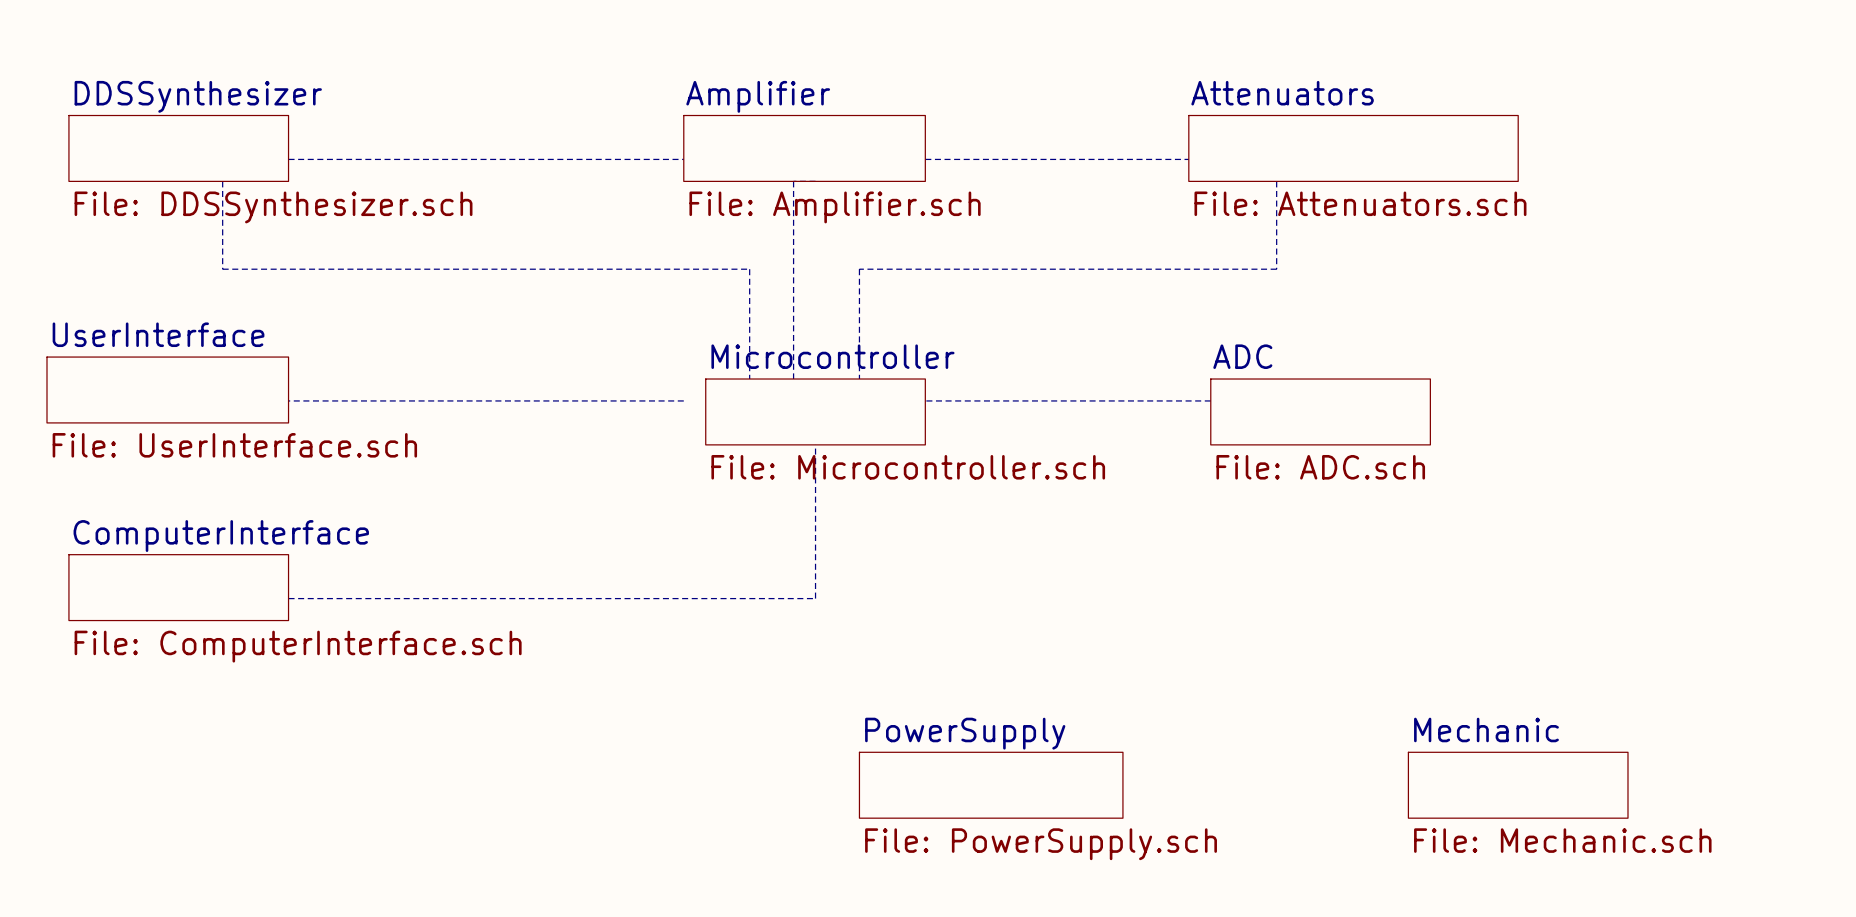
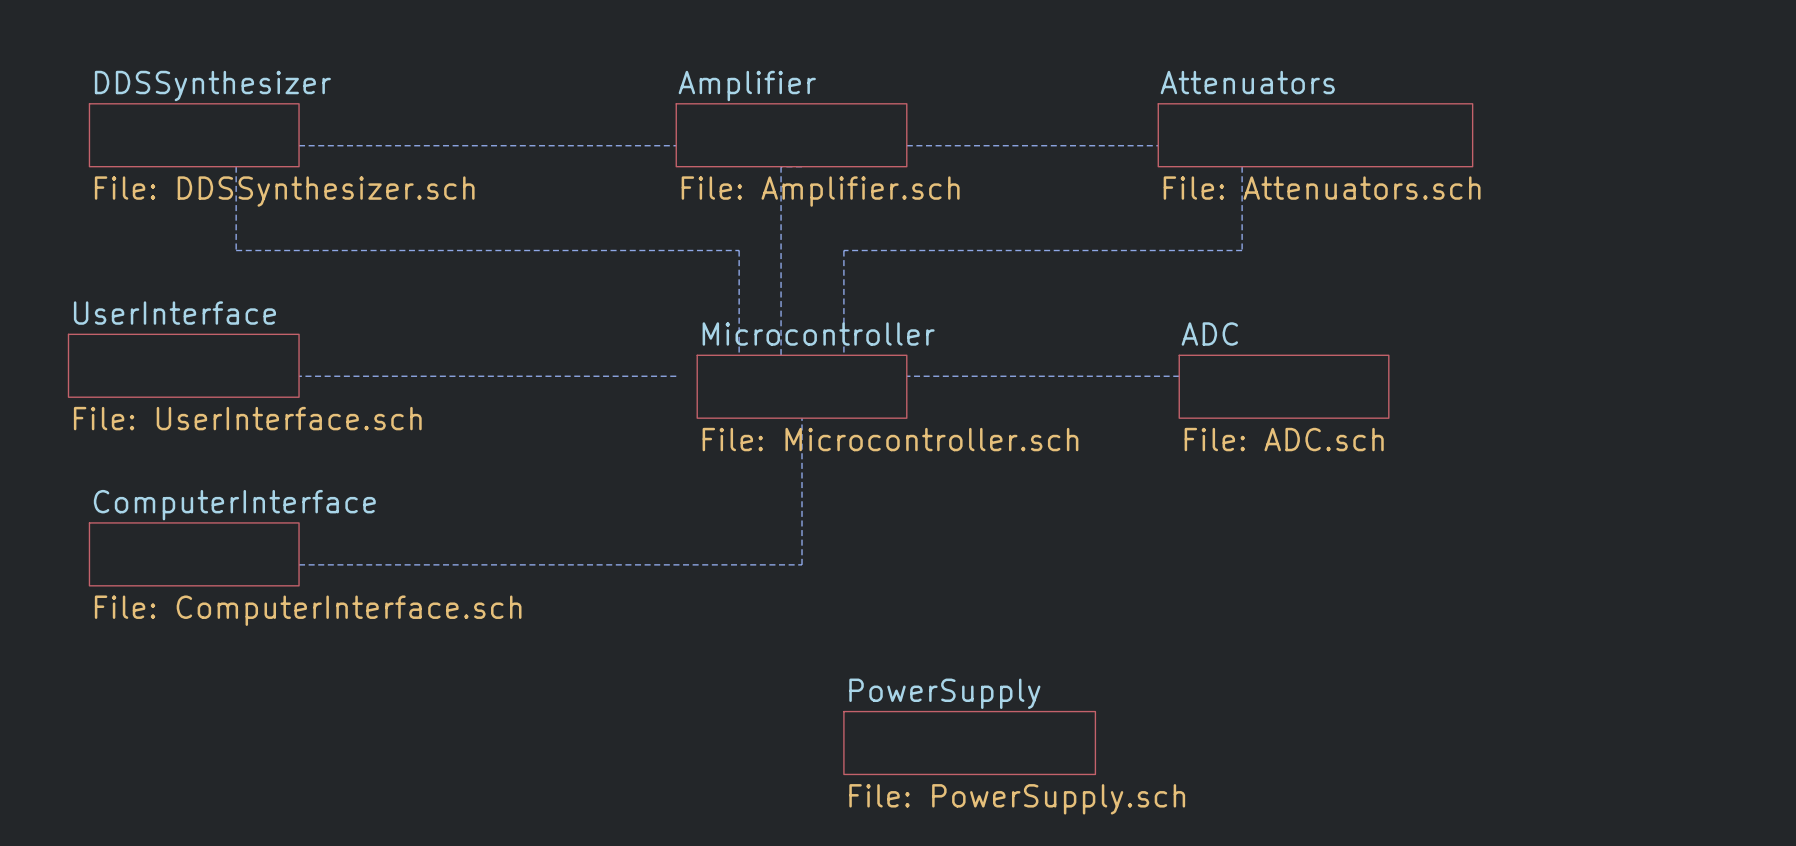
sheet Mechanic: File: Mechanic.sch (1518, 785) -> none

